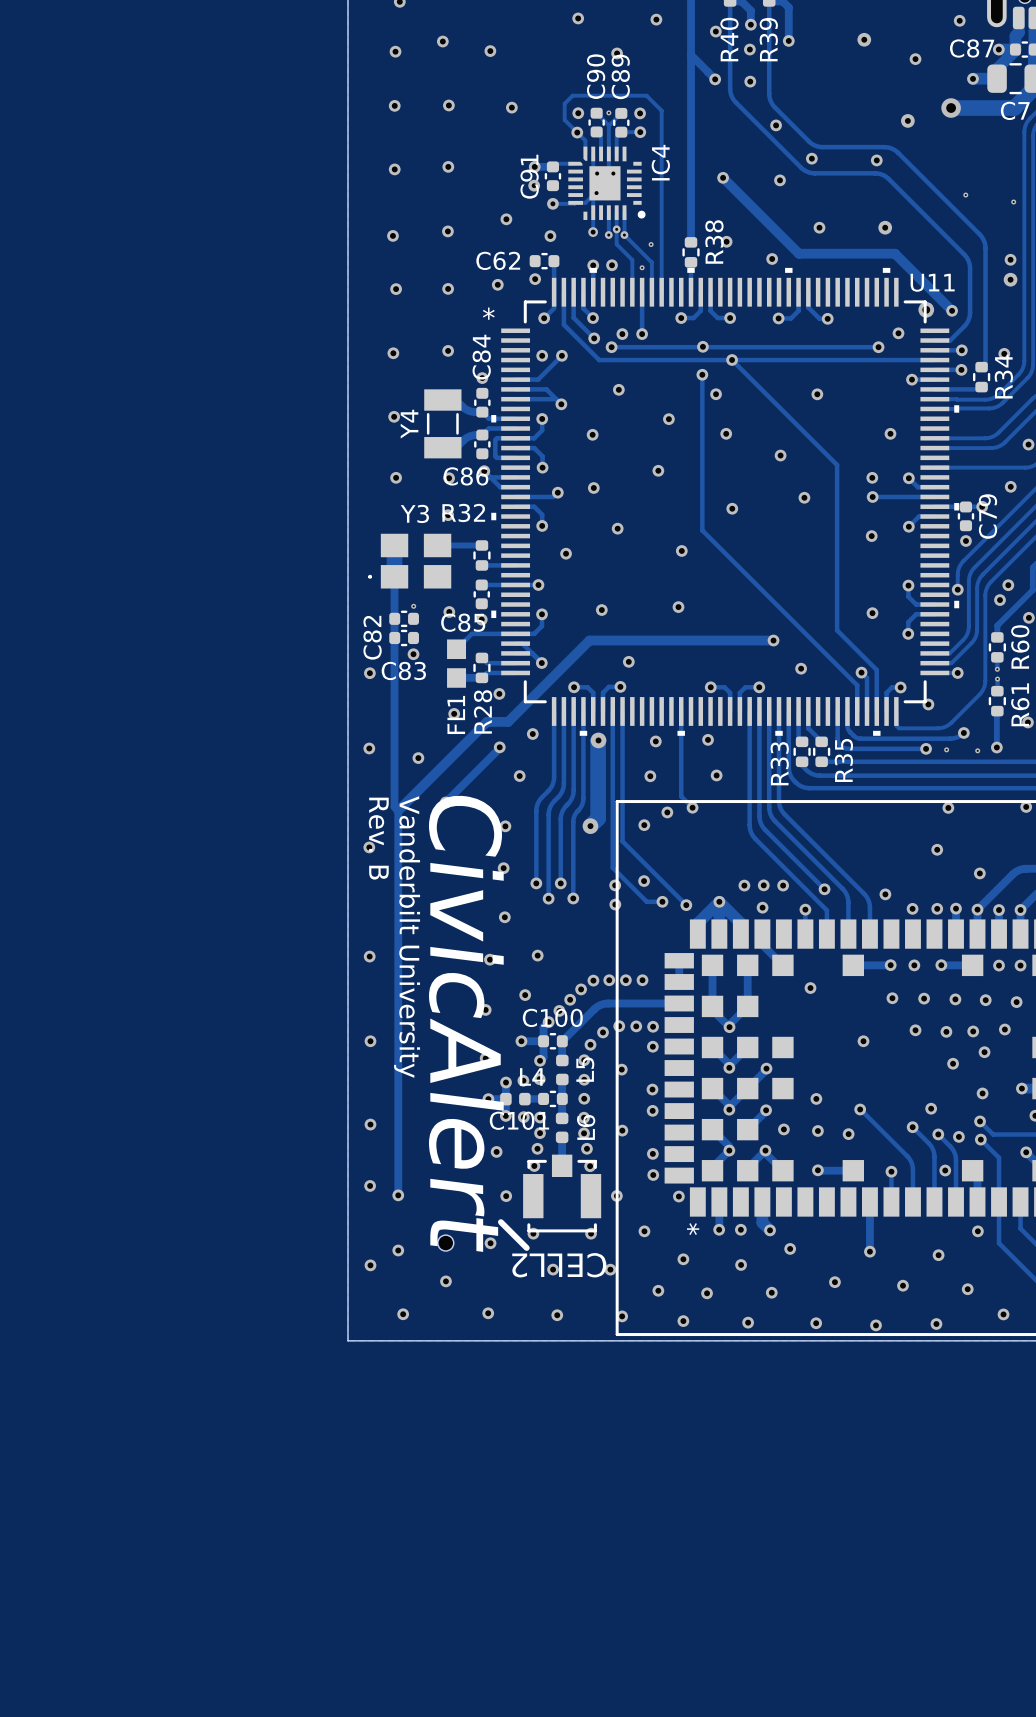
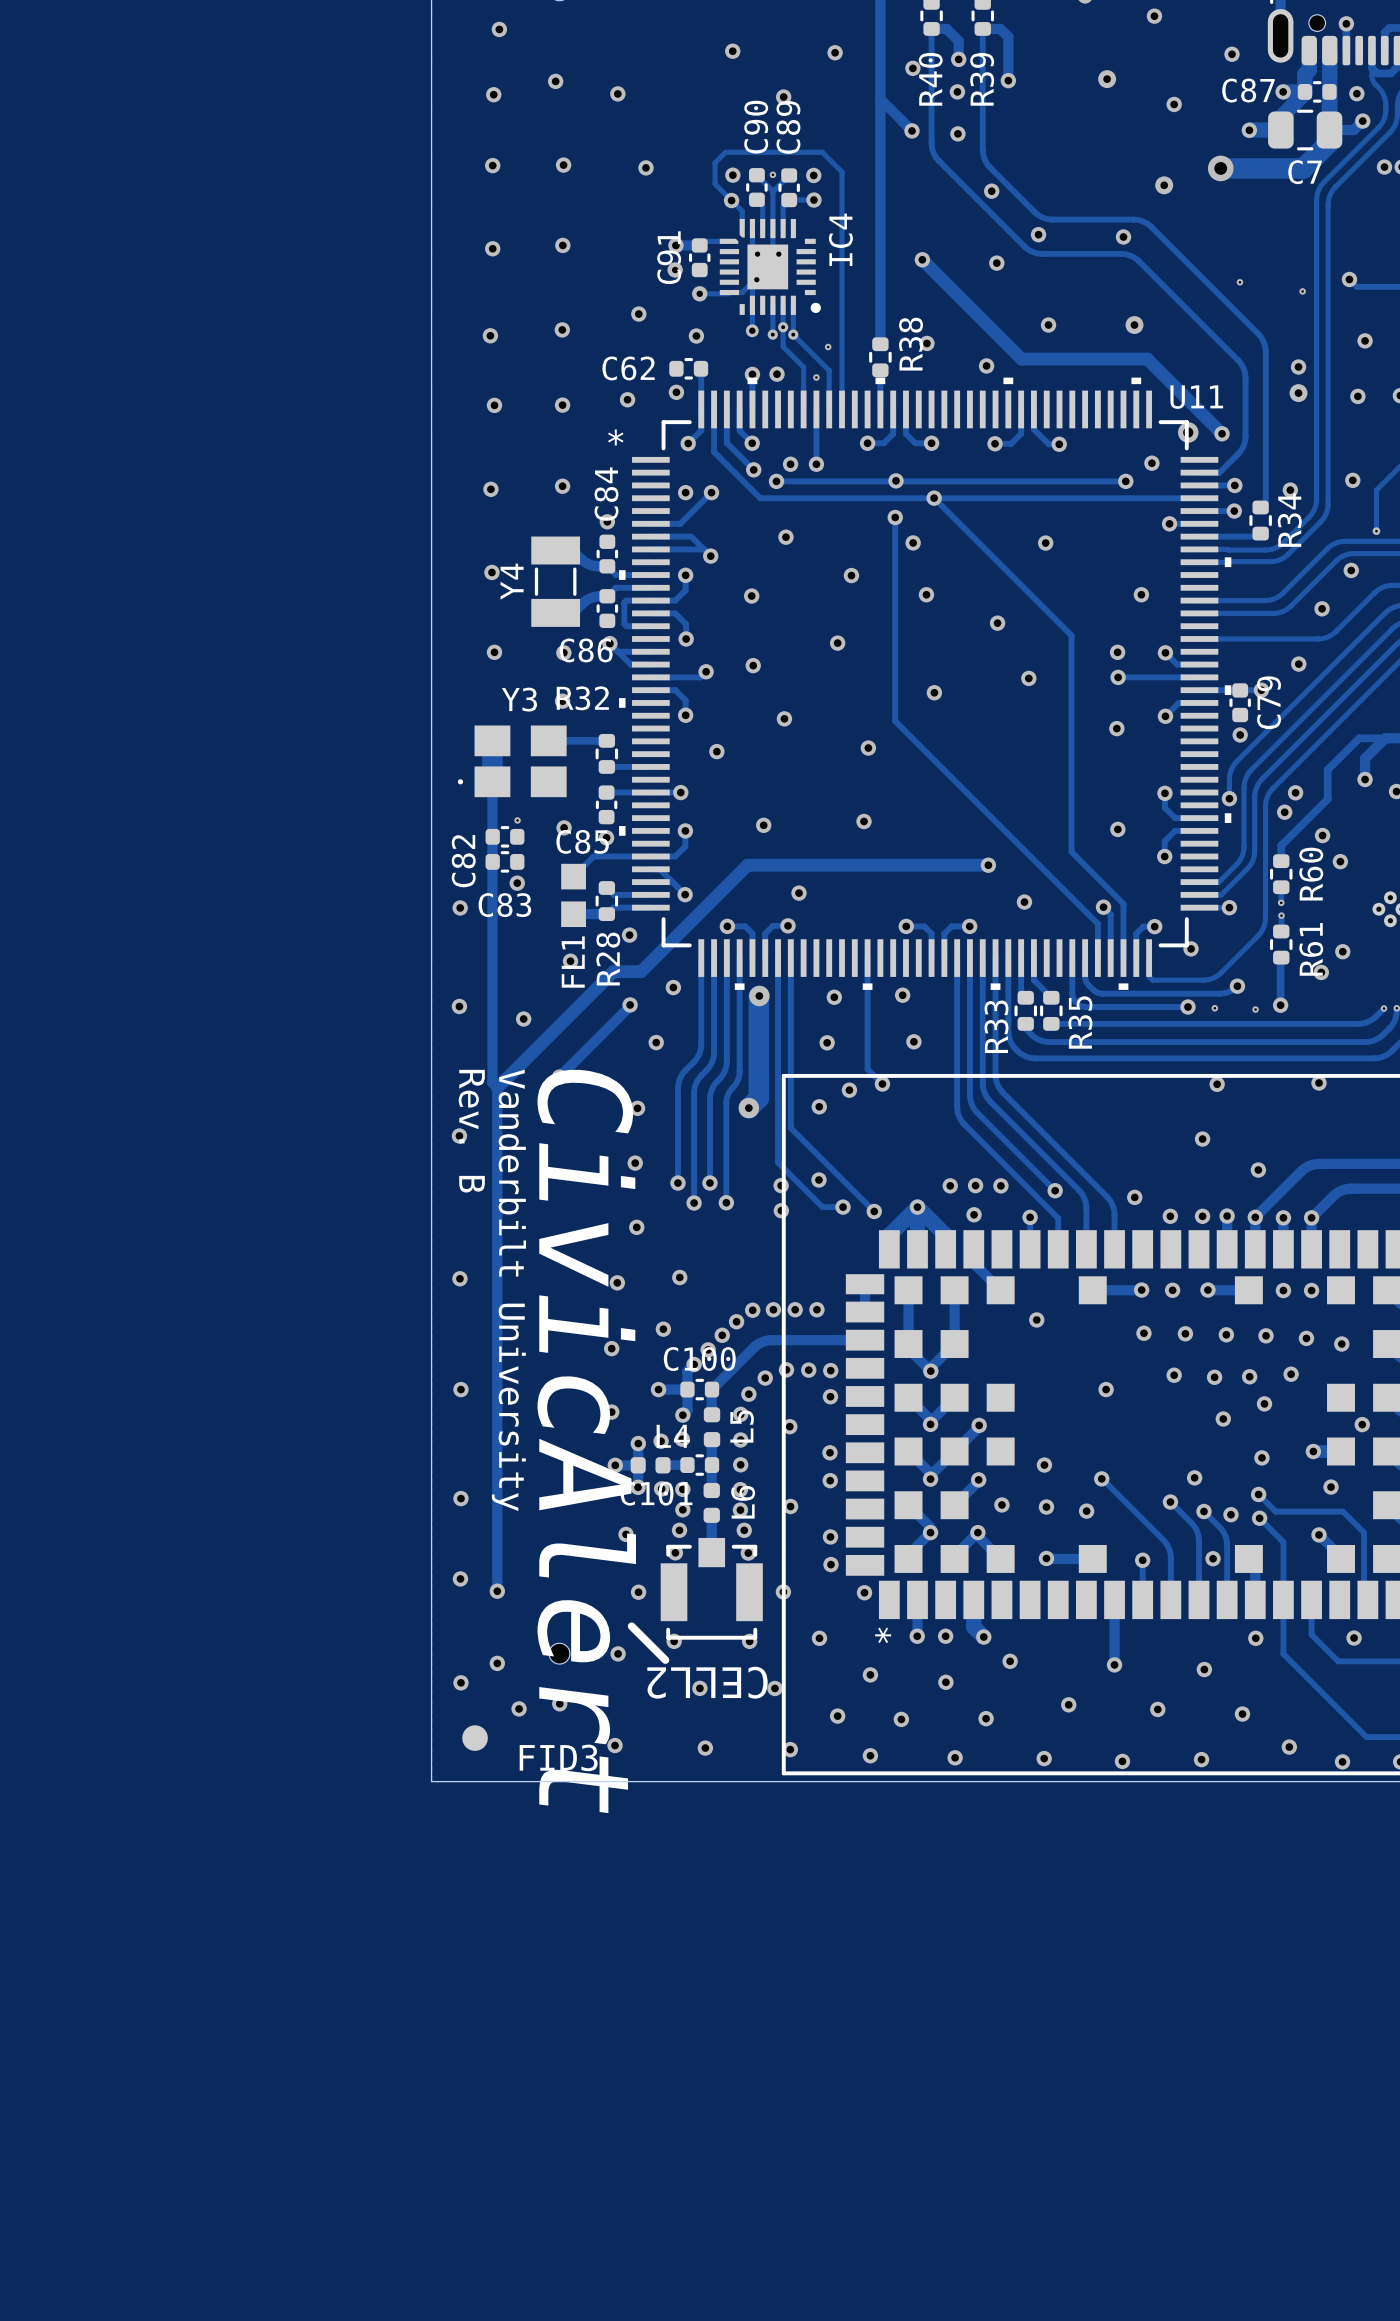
FID3: none -> (475, 1738)
via position: (403, 1314) -> (519, 1708)

